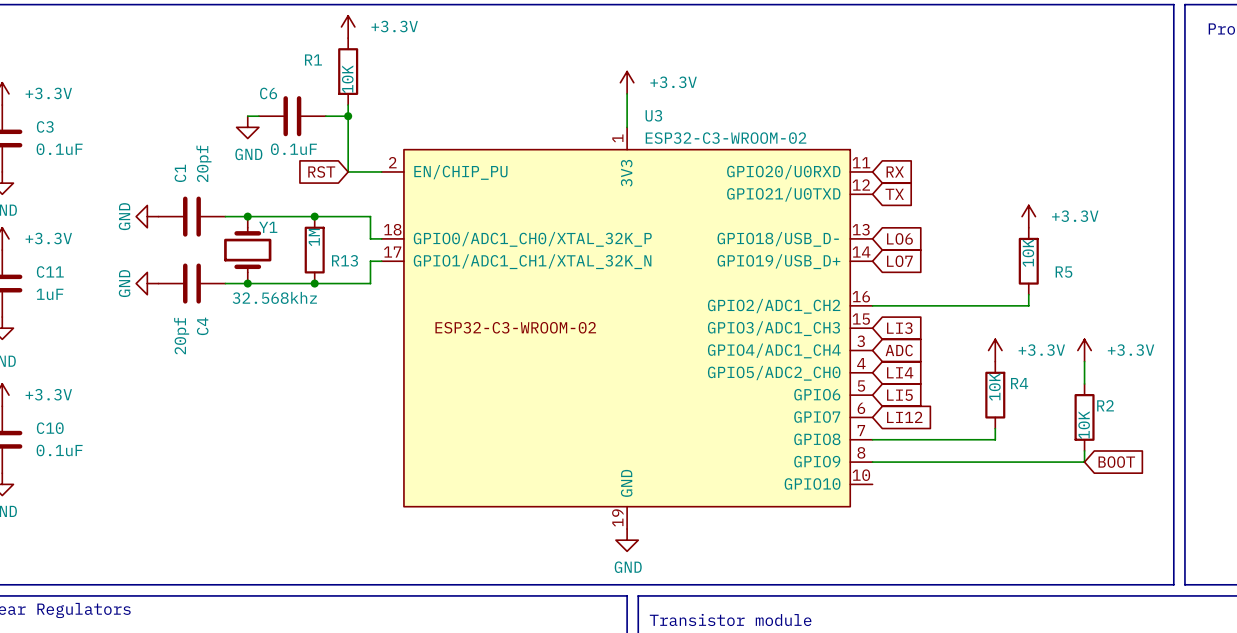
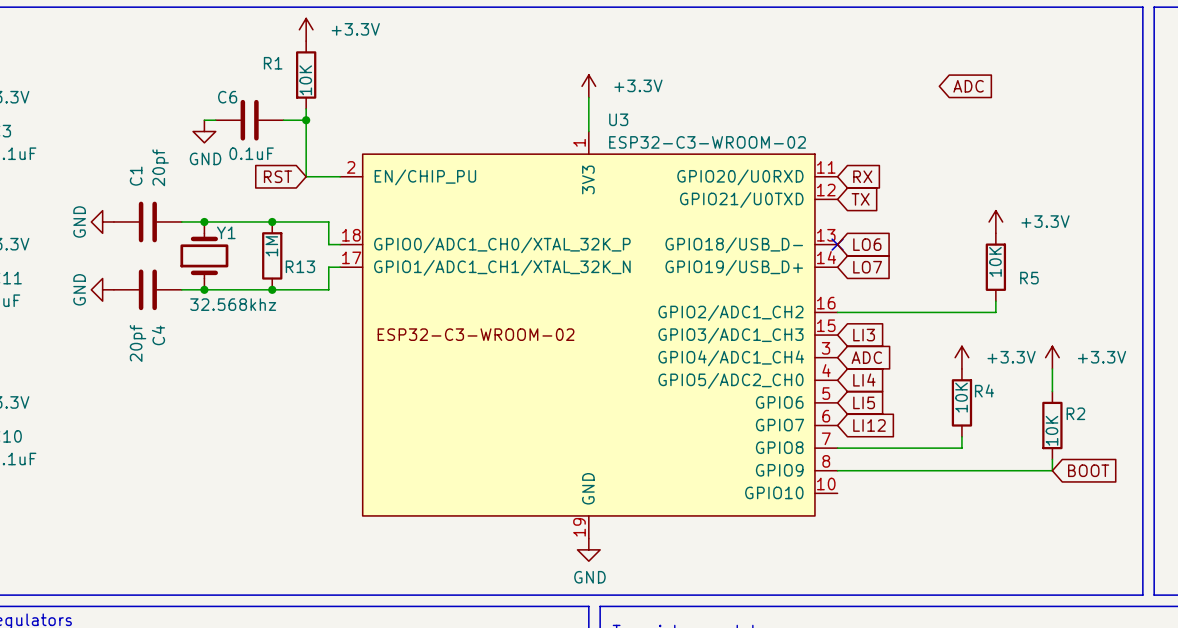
global label: none -> ADC (968, 86)
no-connect mark: none -> (837, 244)

